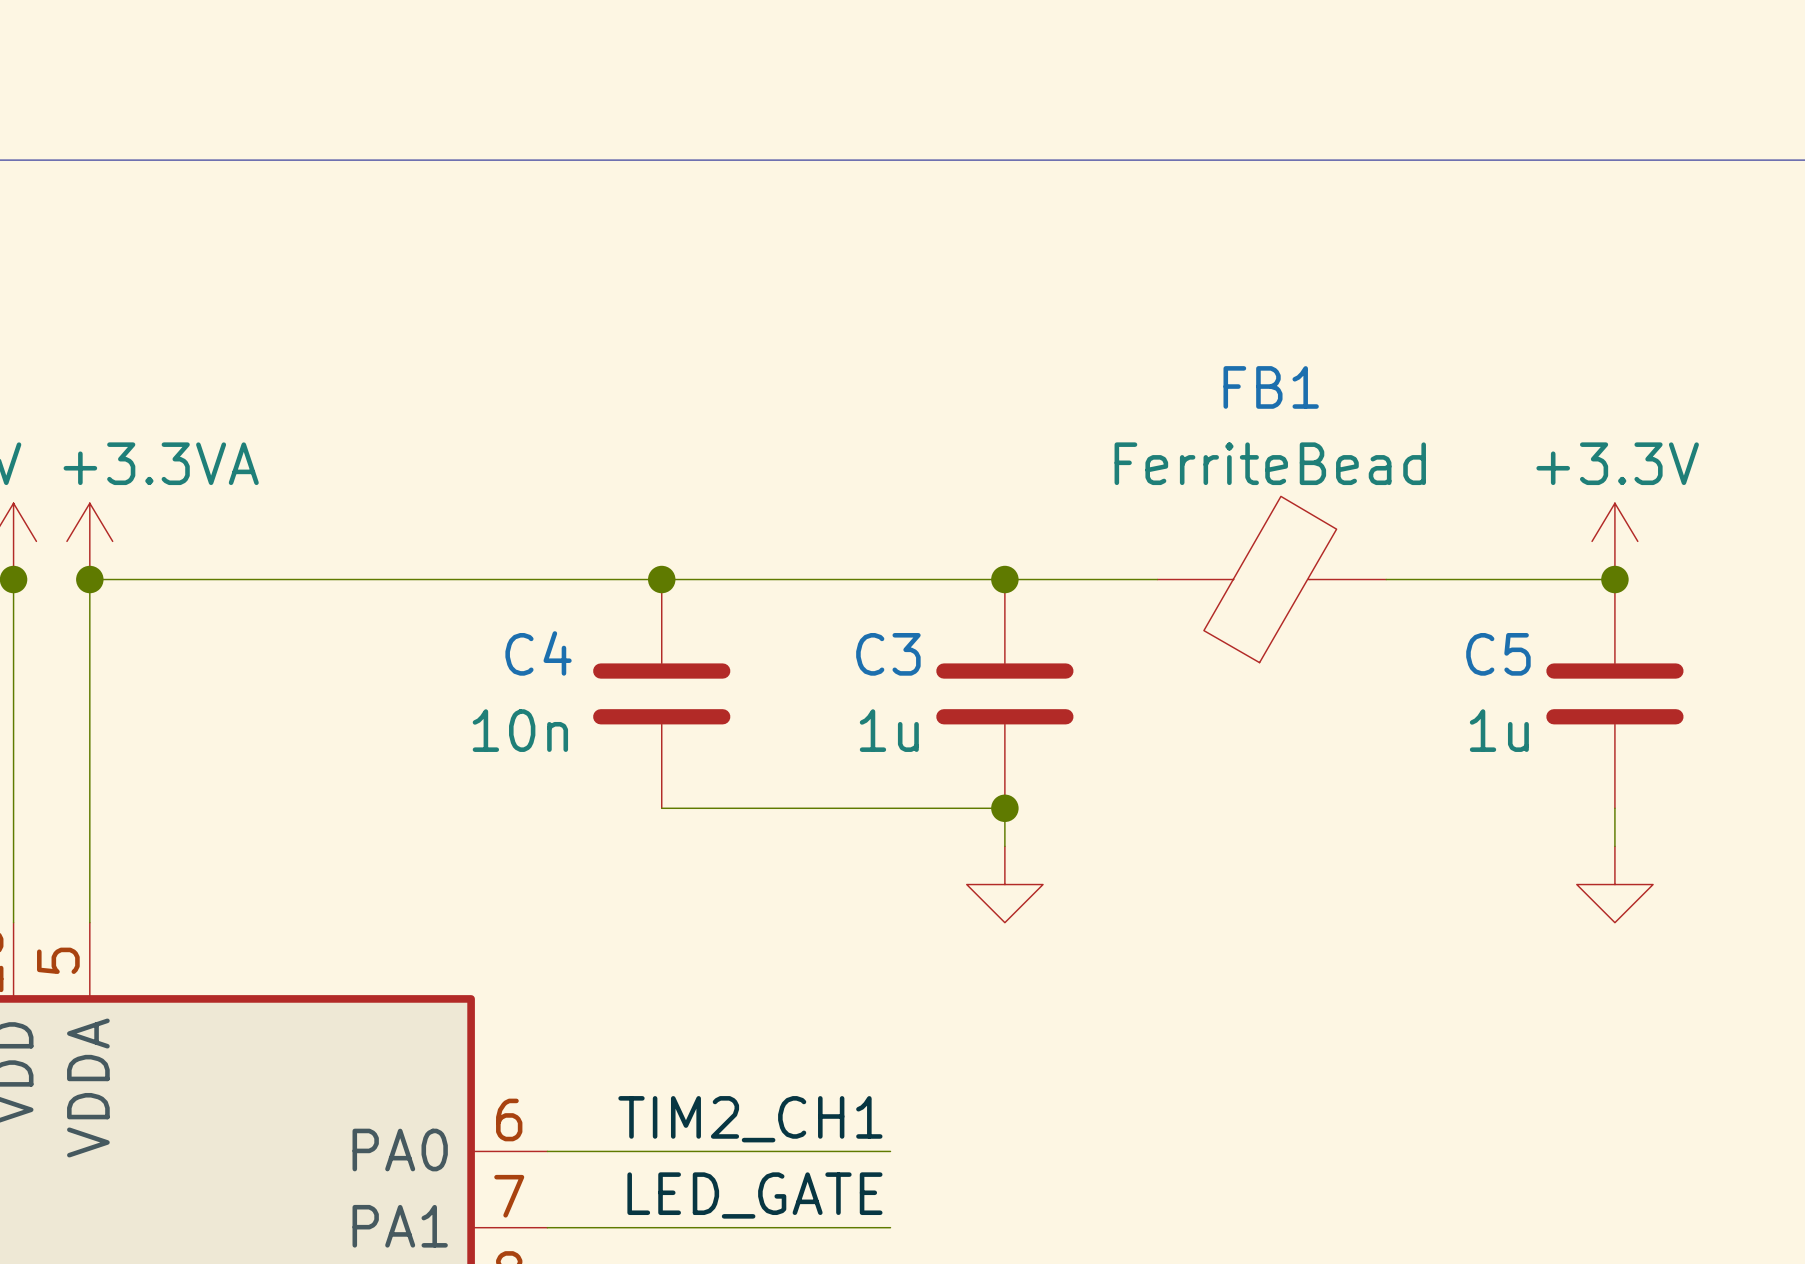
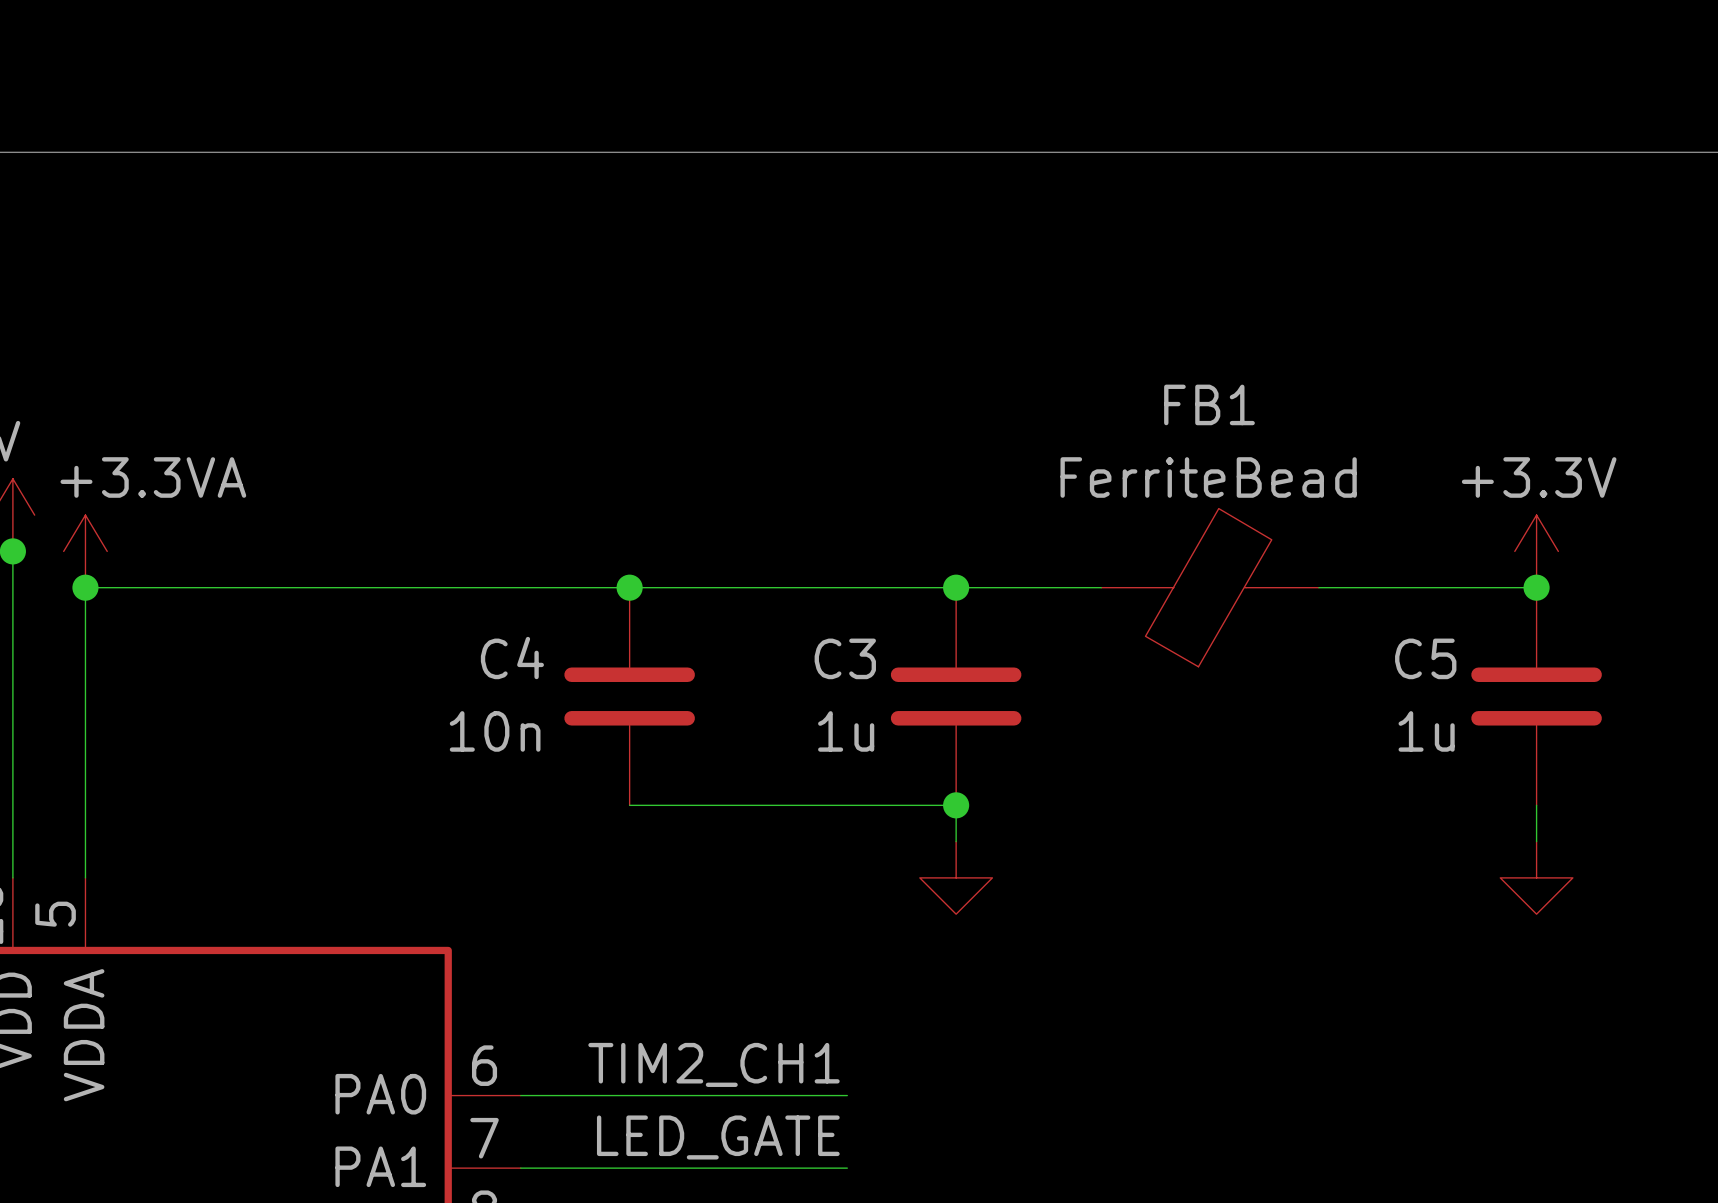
power symbol position: +3.3VA (89, 541) -> +3.3VA (85, 551)
power symbol position: +3.3V (1614, 541) -> +3.3V (1536, 551)
junction position: (89, 579) -> (85, 587)
junction position: (661, 579) -> (629, 587)
junction position: (1004, 579) -> (956, 587)
wire: (1157, 579) (89, 579) (89, 617) -> (1101, 587) (85, 587)
FB1 position: (1271, 579) -> (1210, 587)
wire: (1386, 579) (1614, 579) -> (1318, 587) (1536, 587)
junction position: (1614, 579) -> (1536, 587)
C4 position: (661, 693) -> (629, 696)
C3 position: (1004, 693) -> (956, 696)
C5 position: (1614, 693) -> (1536, 696)
wire: (661, 808) (1004, 808) (1004, 846) -> (629, 805) (956, 805) (956, 841)
junction position: (1004, 808) -> (956, 805)
power symbol position: (1004, 884) -> (956, 877)
power symbol position: (1614, 884) -> (1536, 877)

